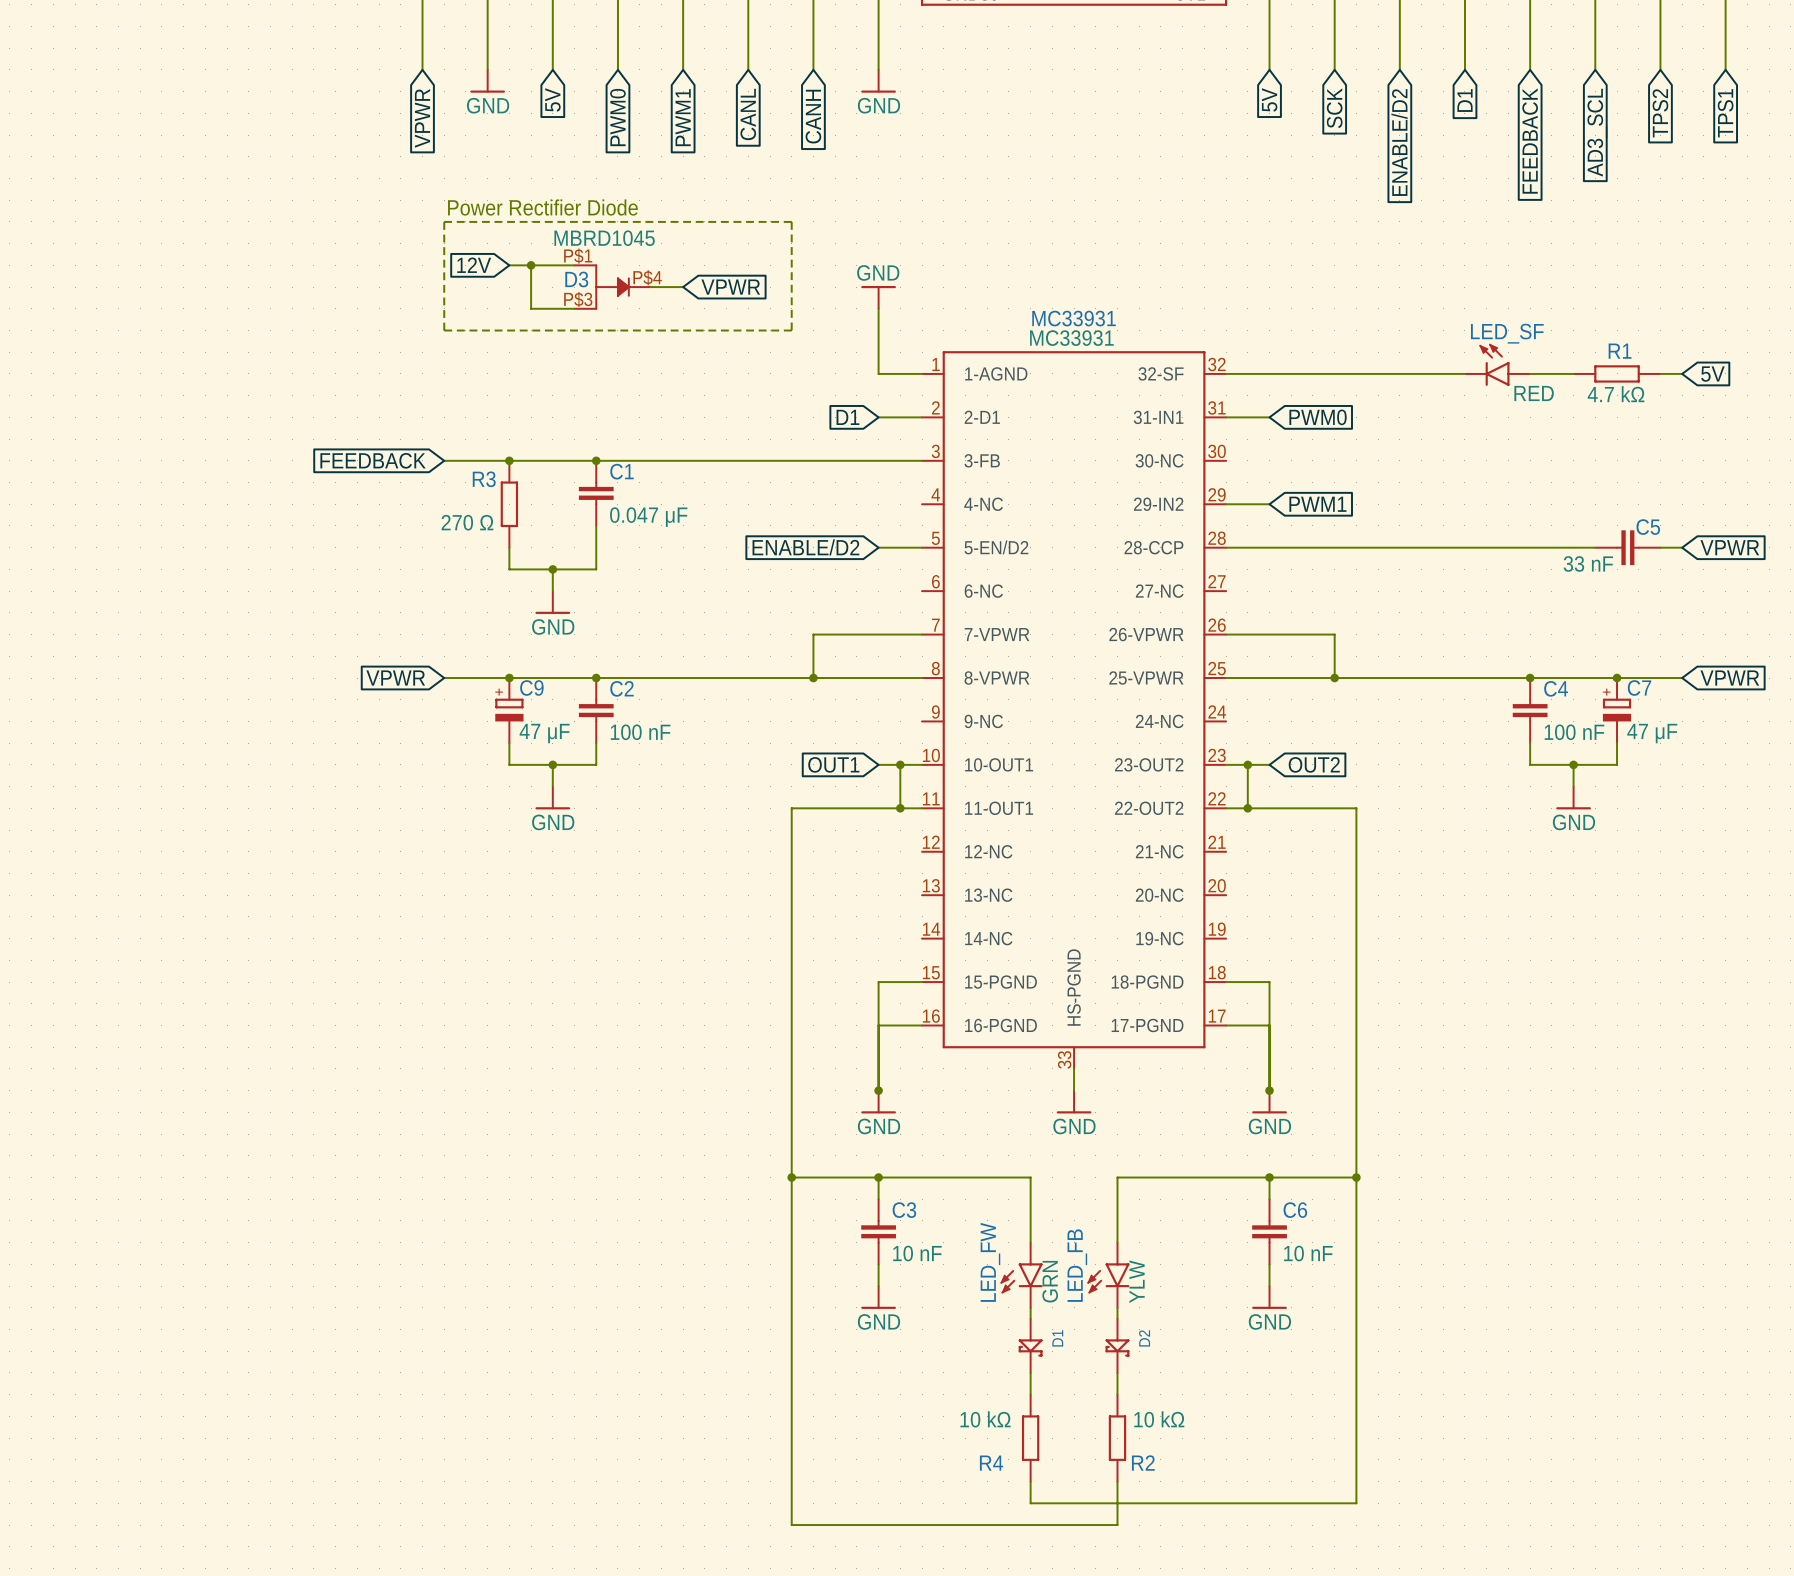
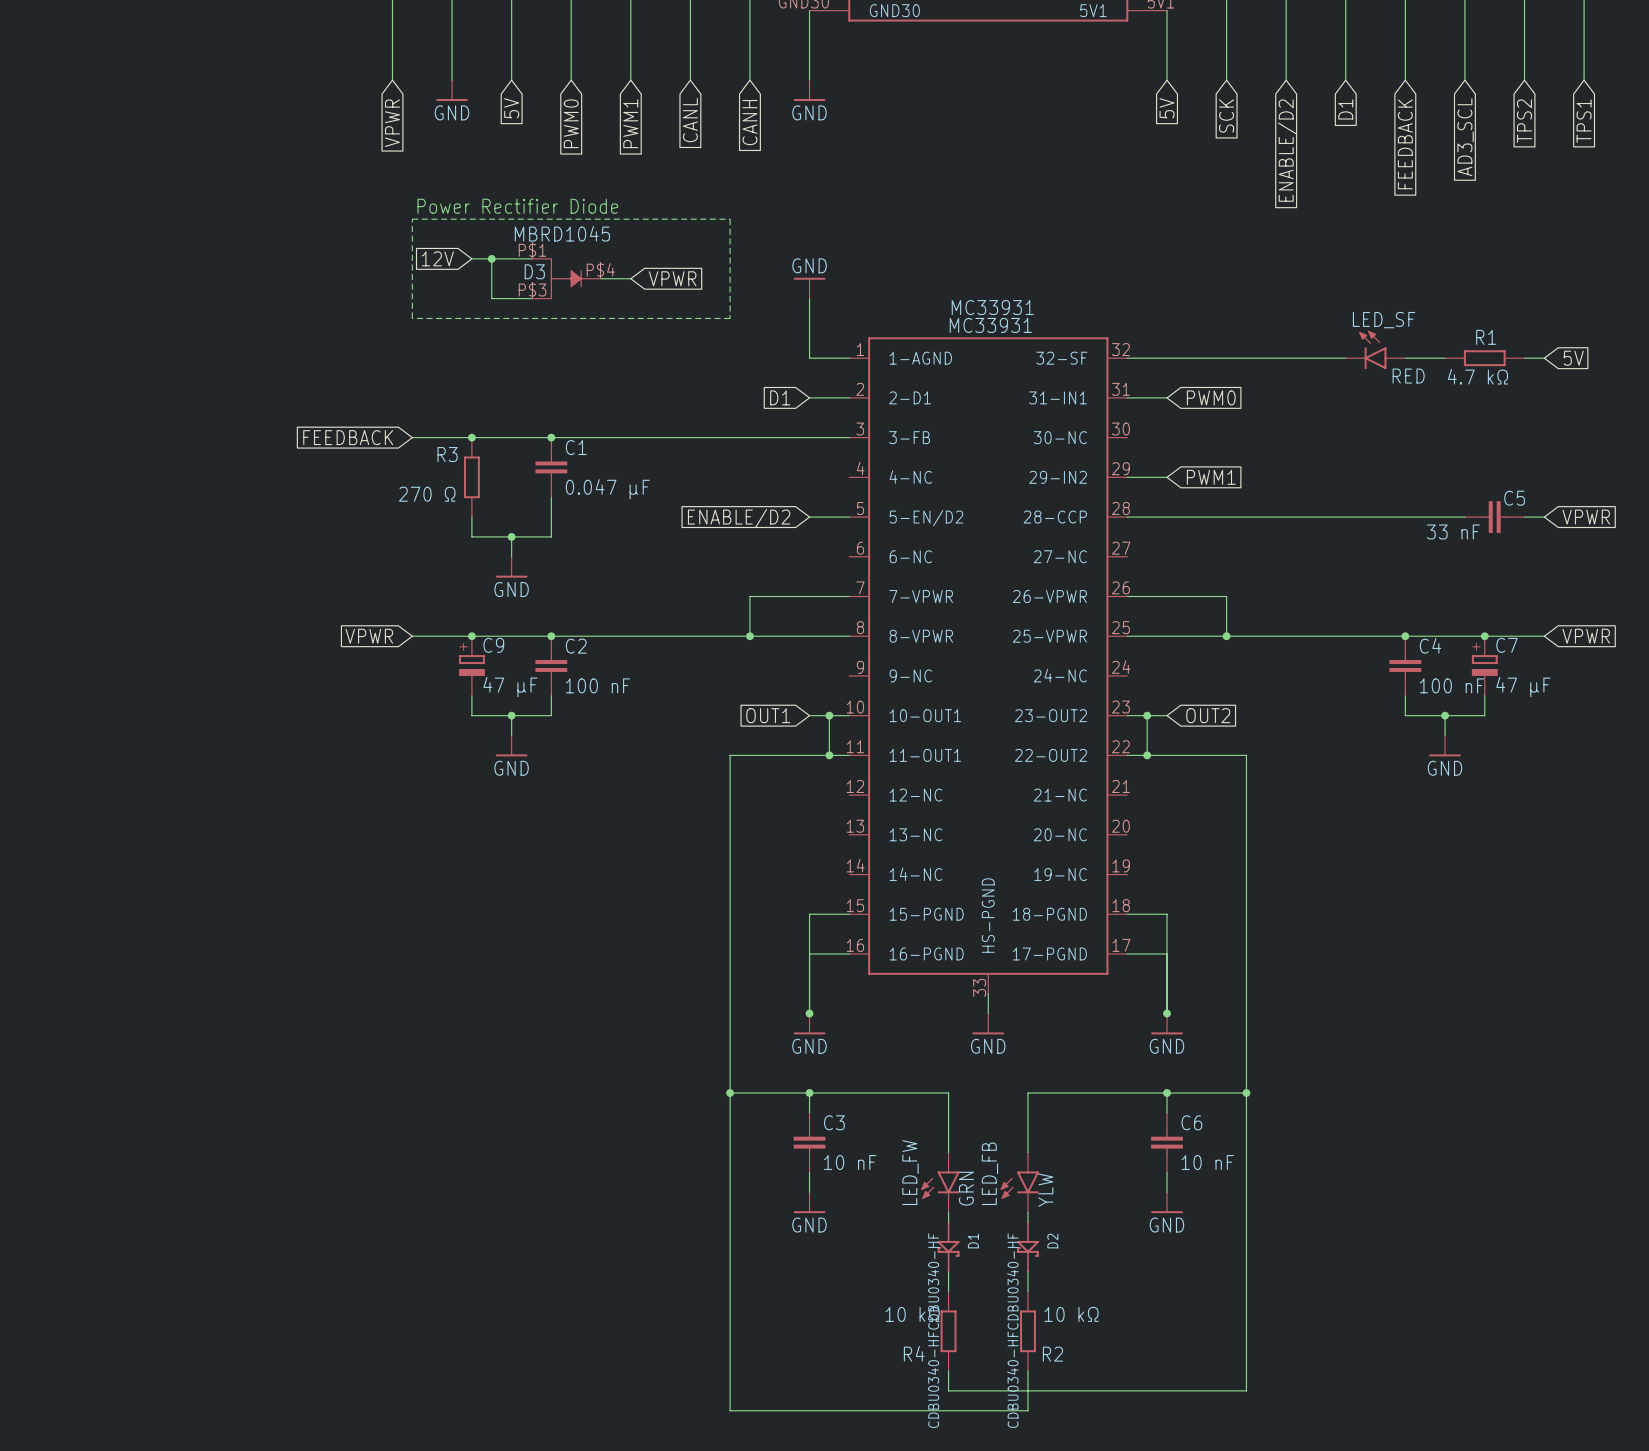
D1 value: none -> CDBU0340-HFCDBU0340-HF (933, 1330)
D2 value: none -> CDBU0340-HFCDBU0340-HF (1012, 1330)

